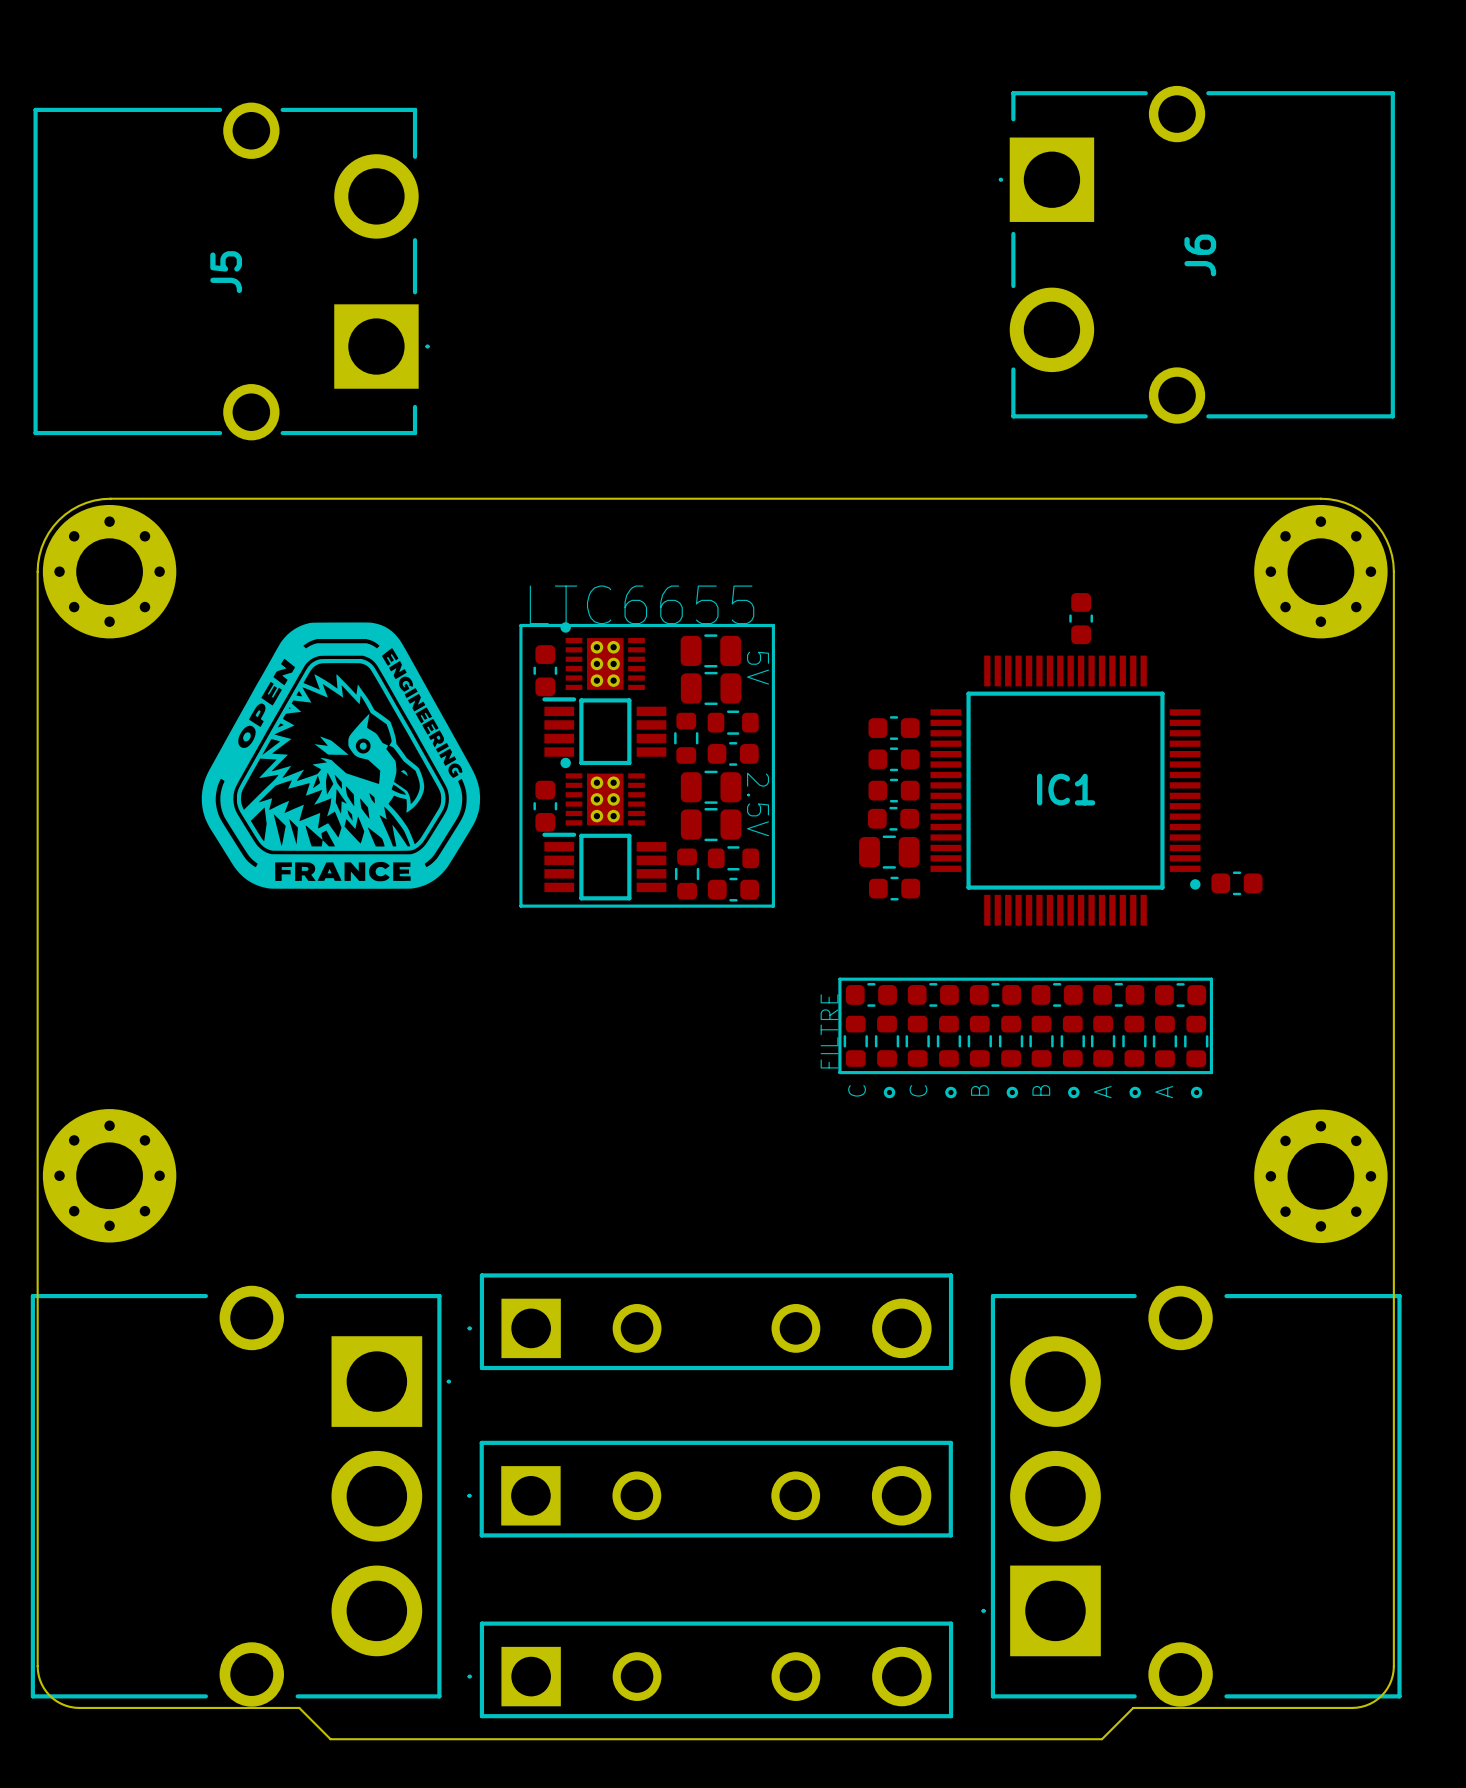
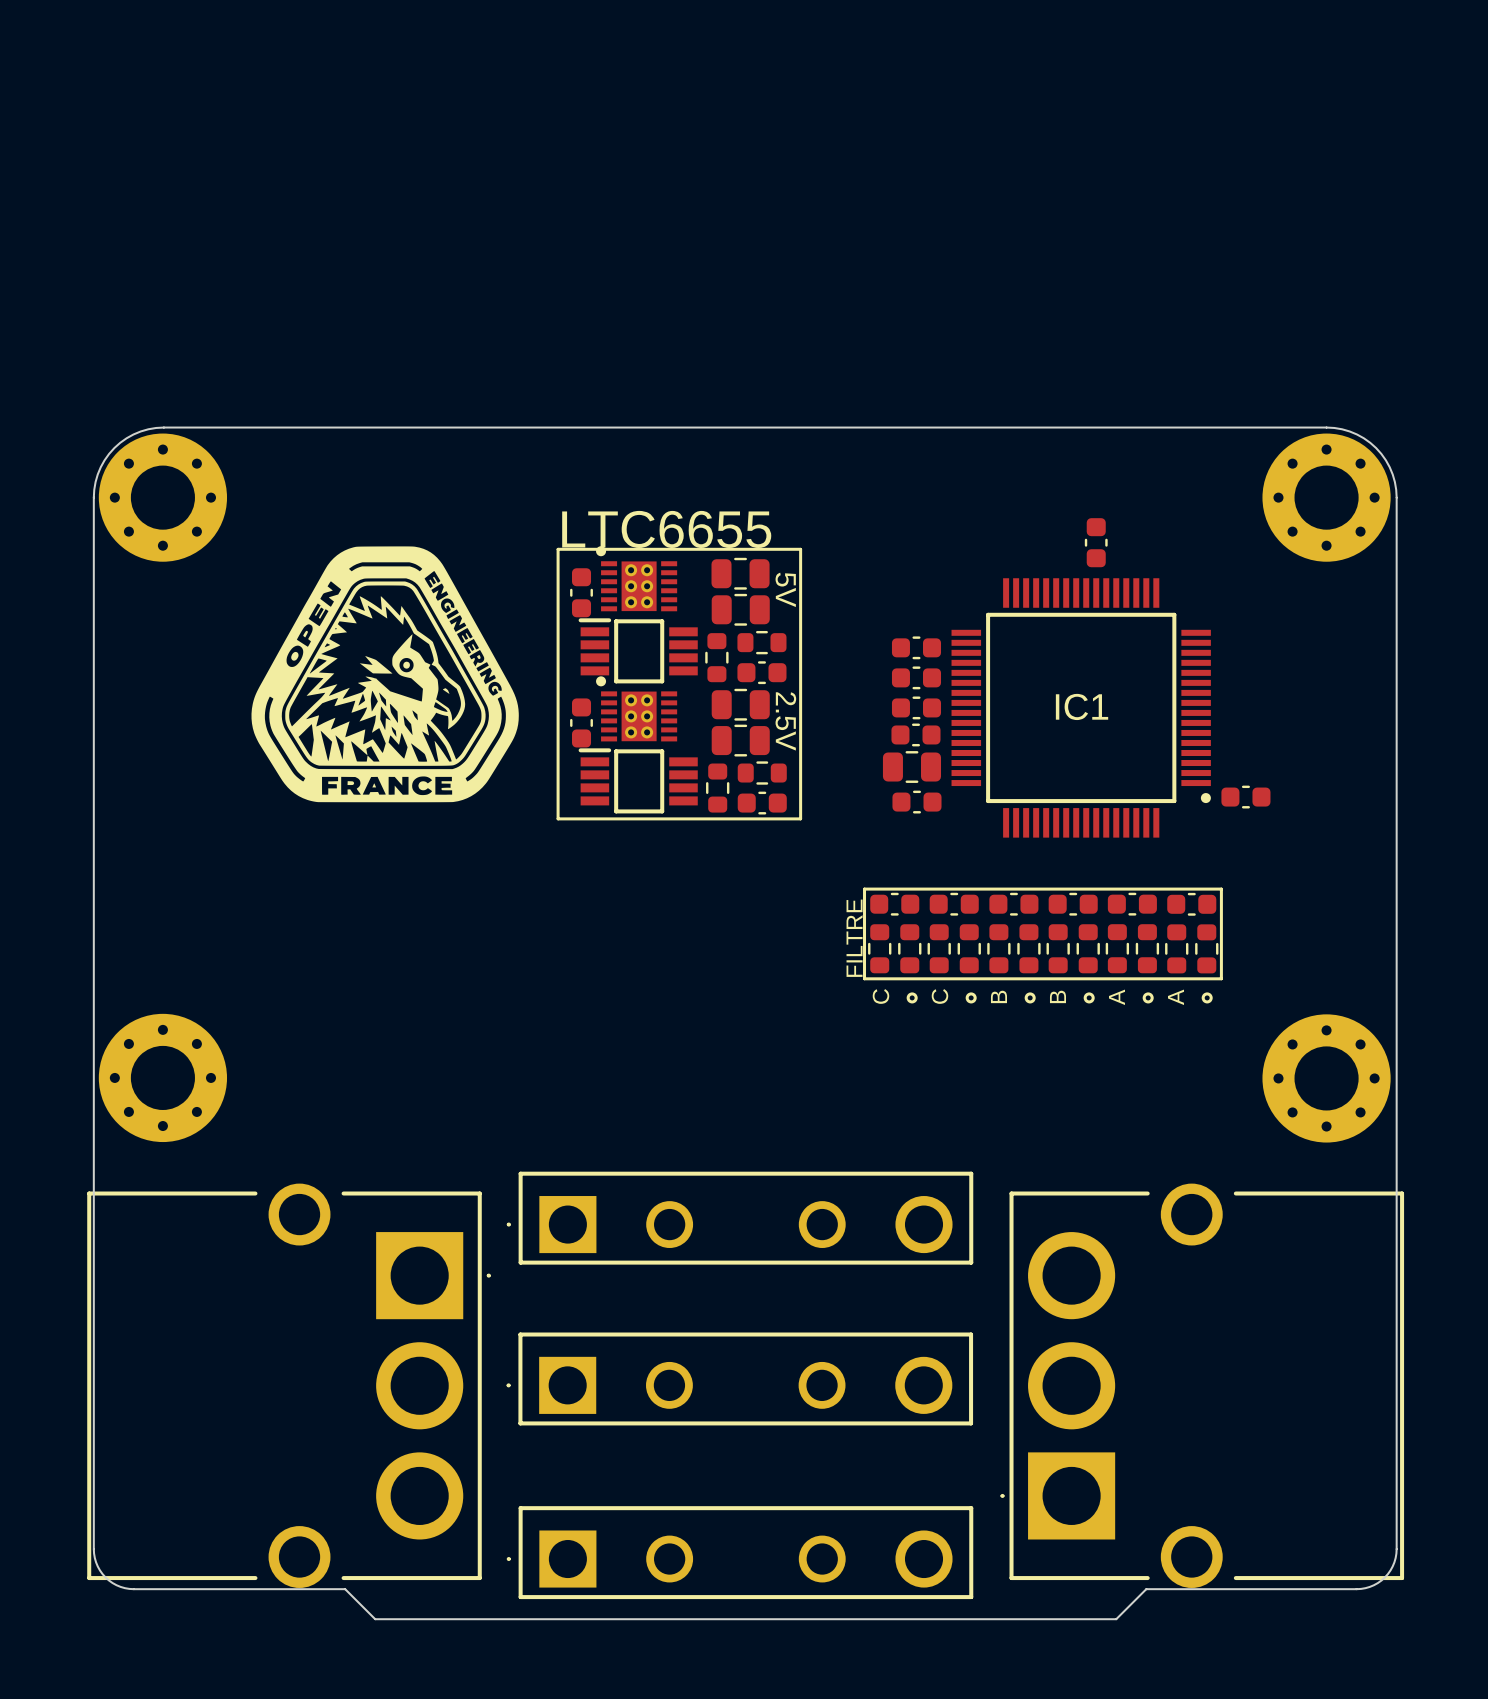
J6: (1196, 254) -> none
J5: (231, 271) -> none

